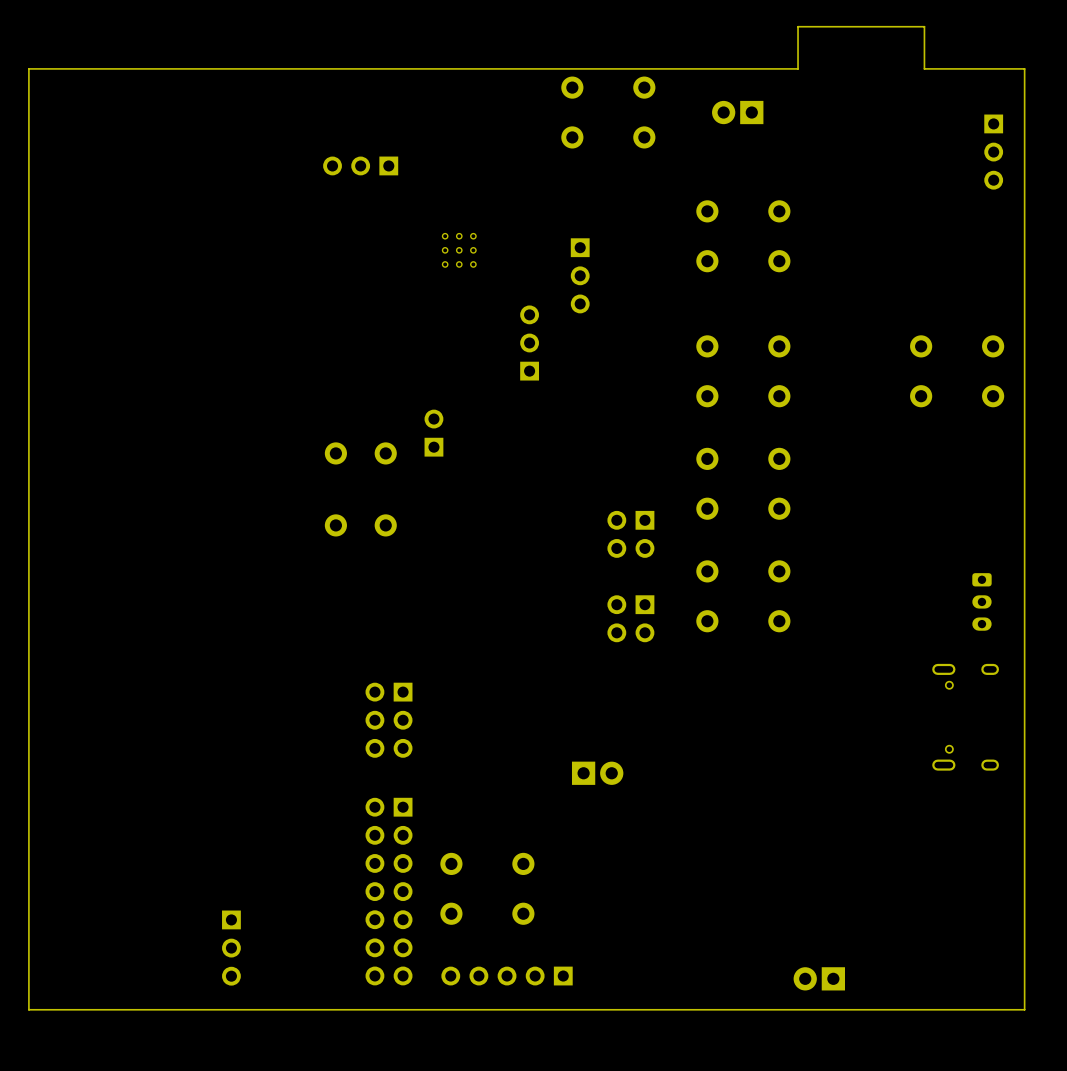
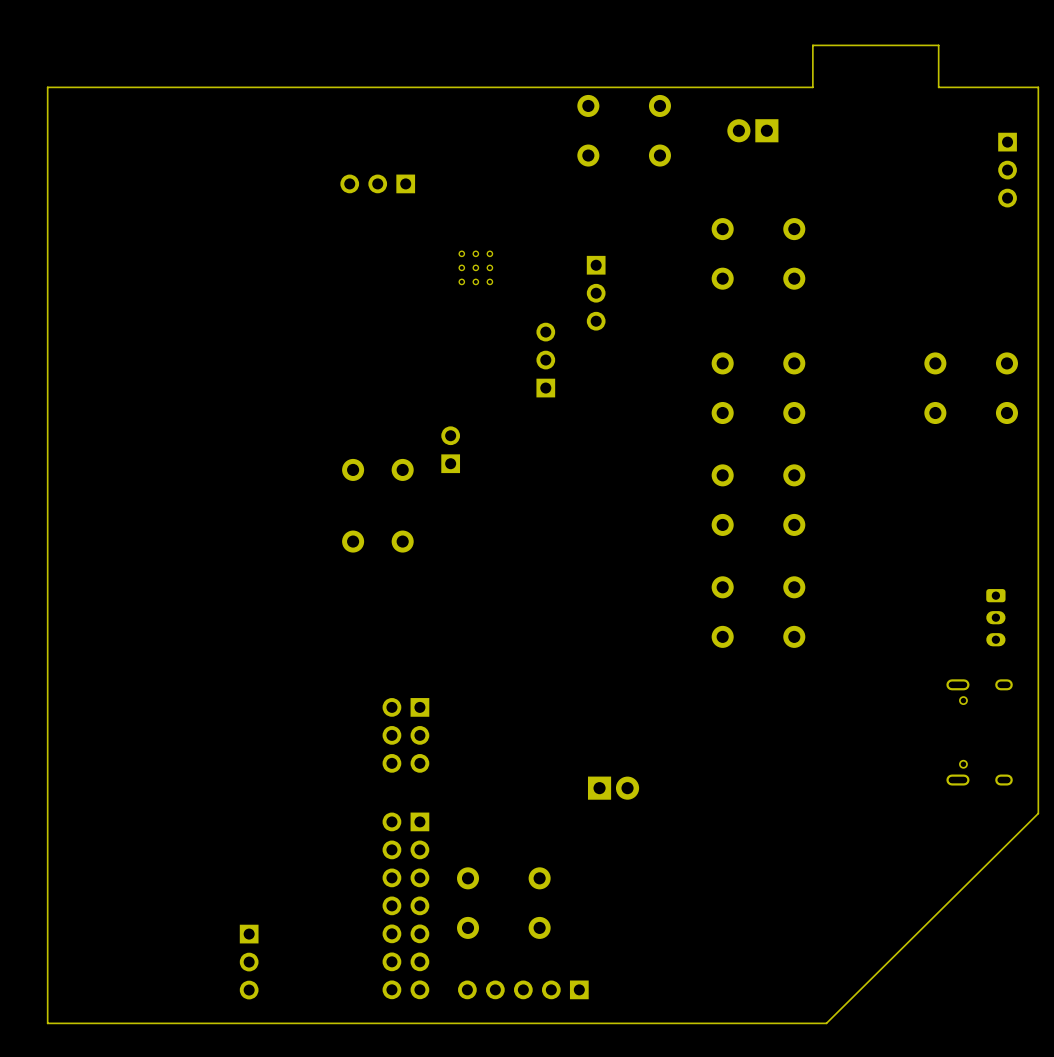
part: (630, 534) -> none
part: (630, 618) -> none
board edge: (1024, 798) (1024, 1009) (28, 1009) -> (1038, 813) (826, 1023) (47, 1023)
part: (819, 978) -> none

